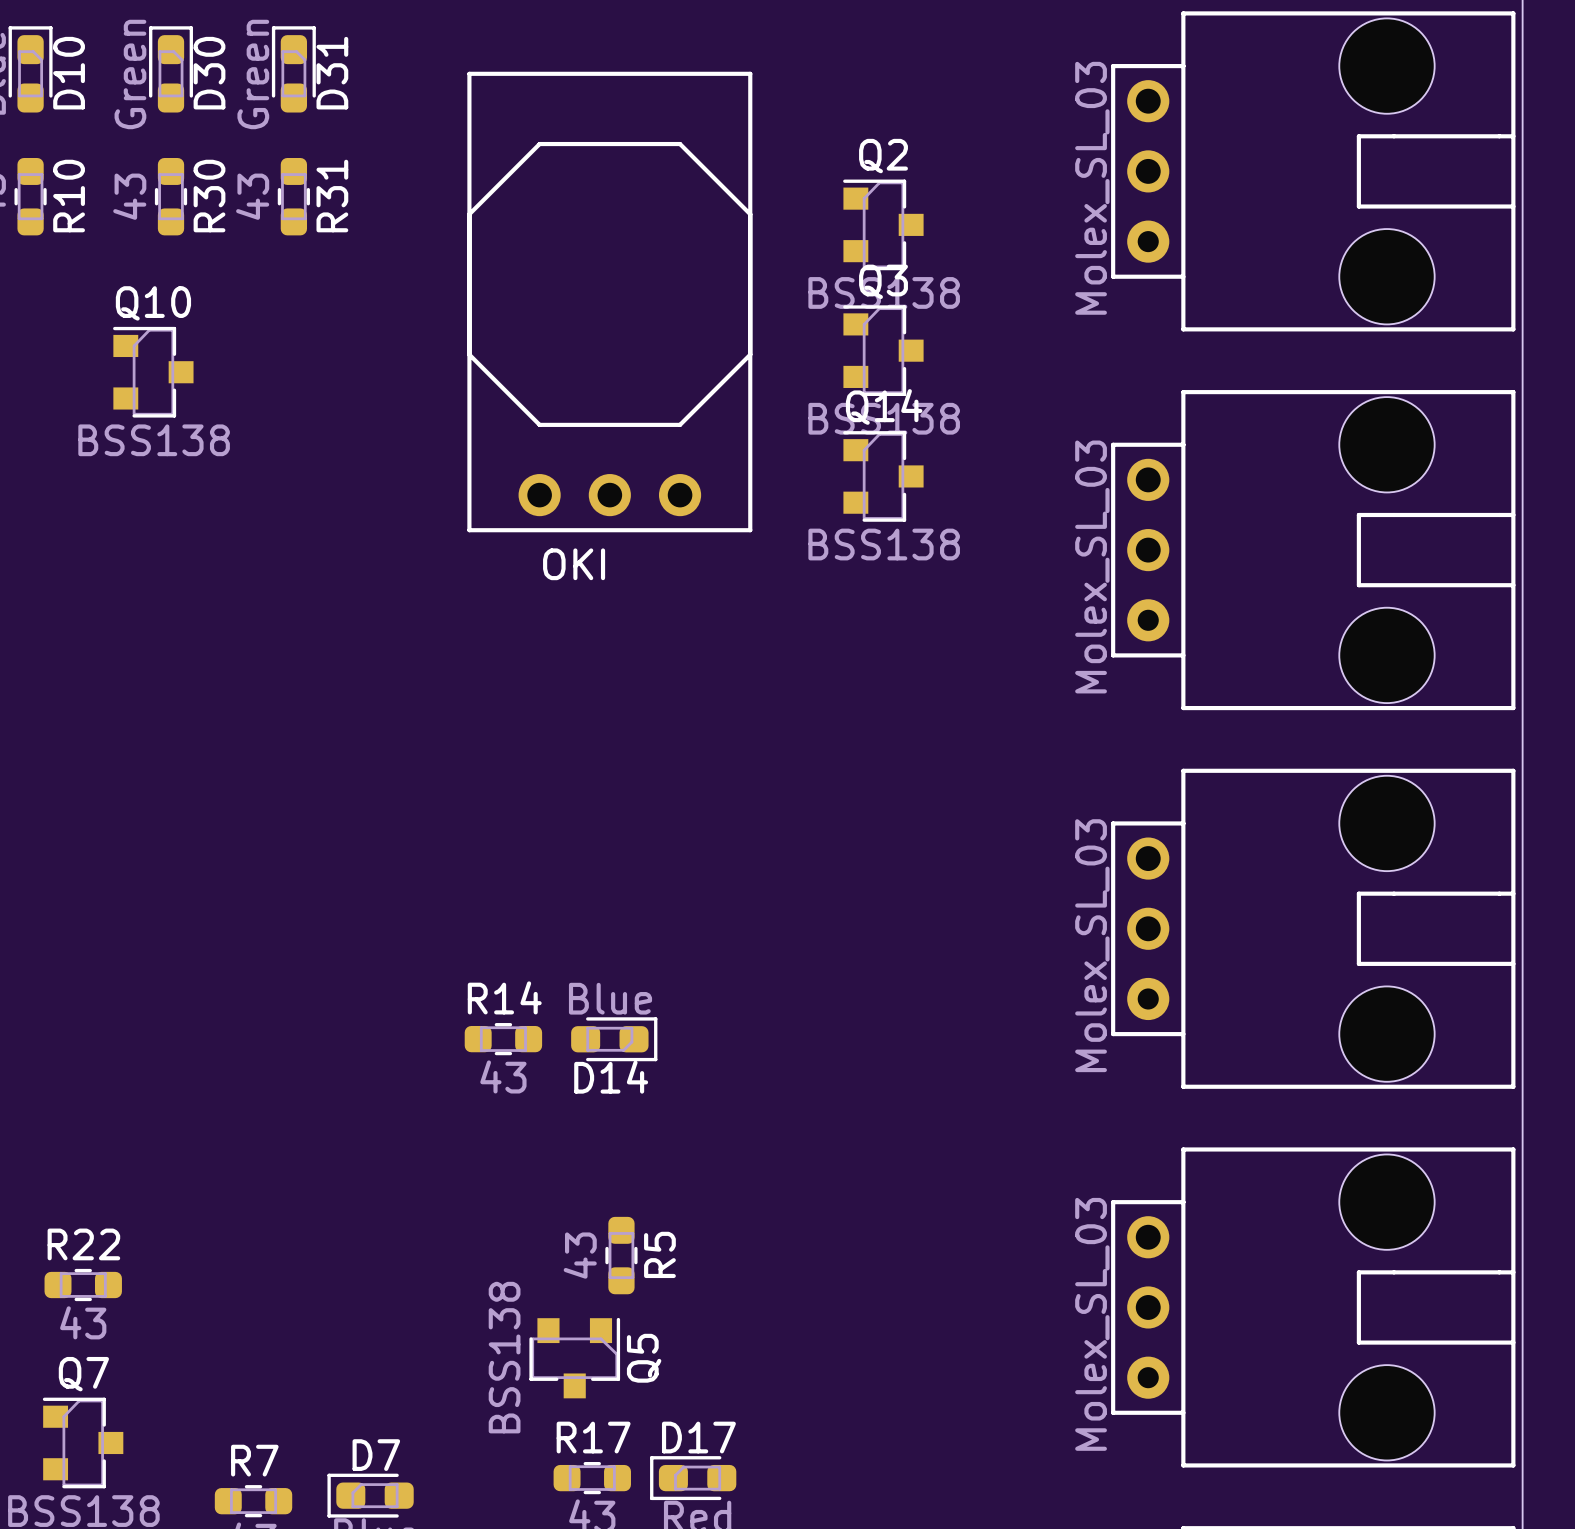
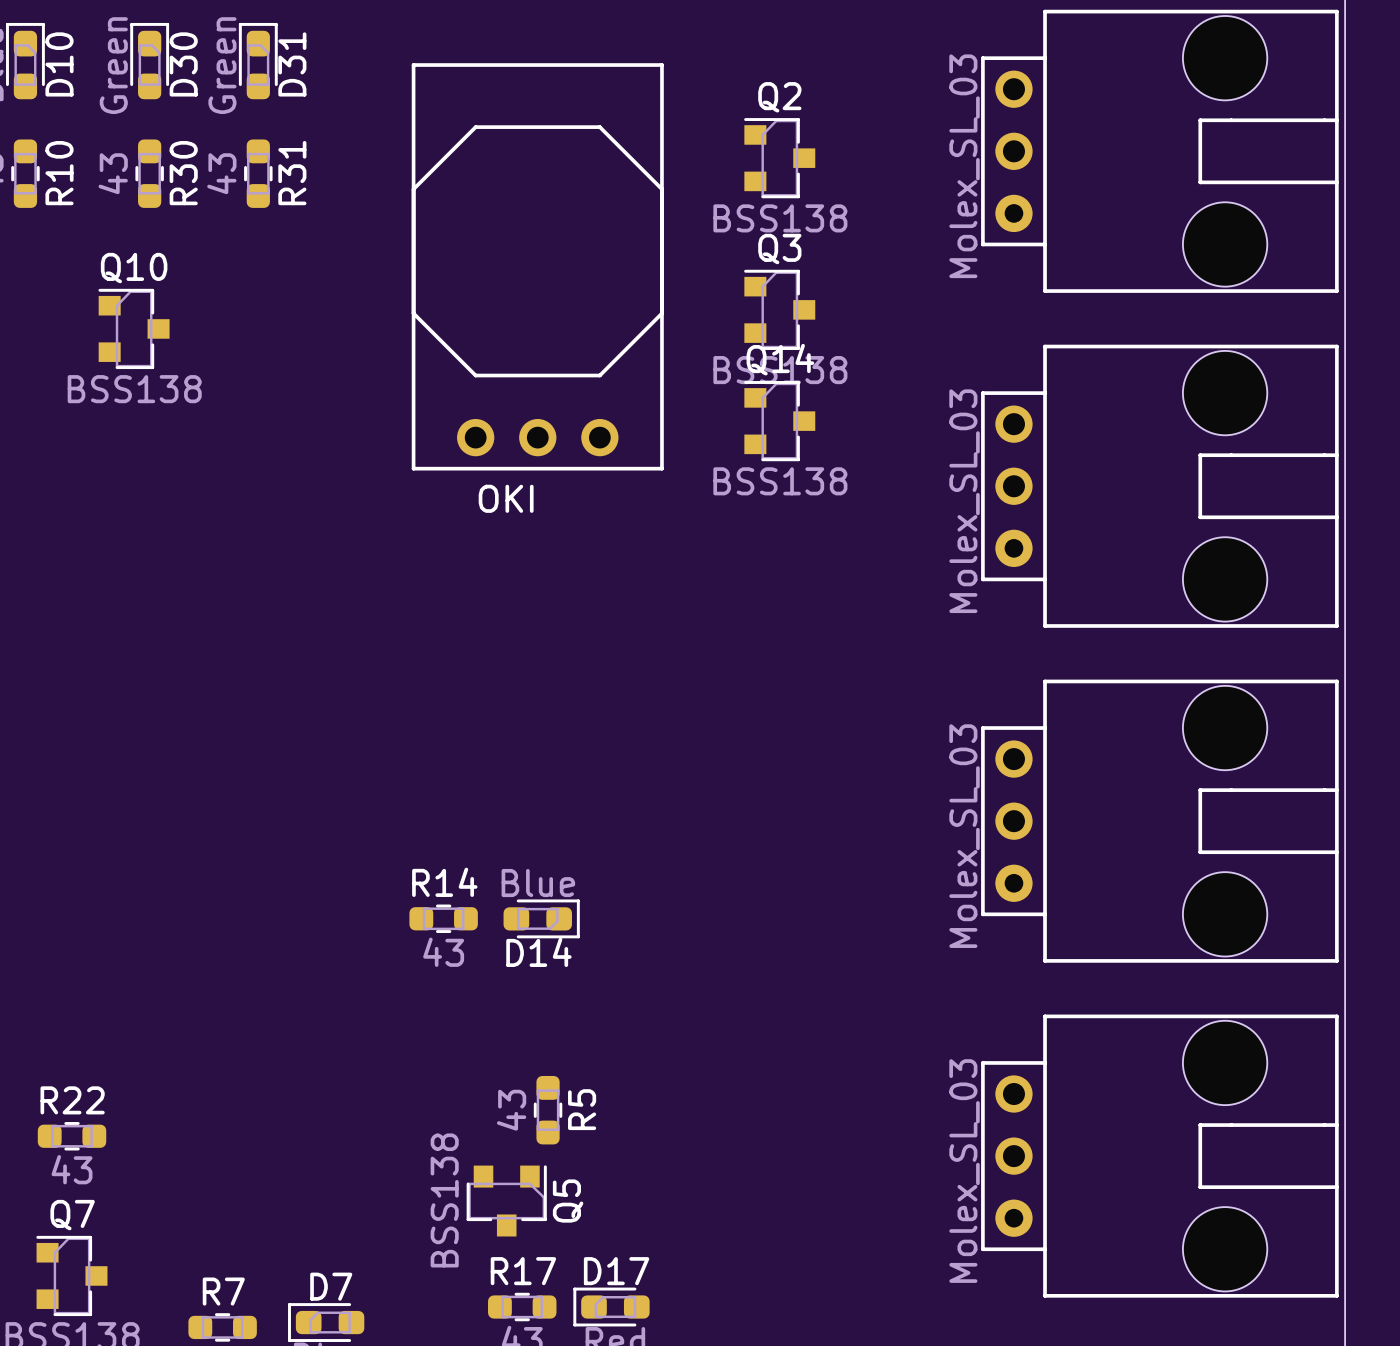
Q2 position: (883, 224) -> (779, 158)

